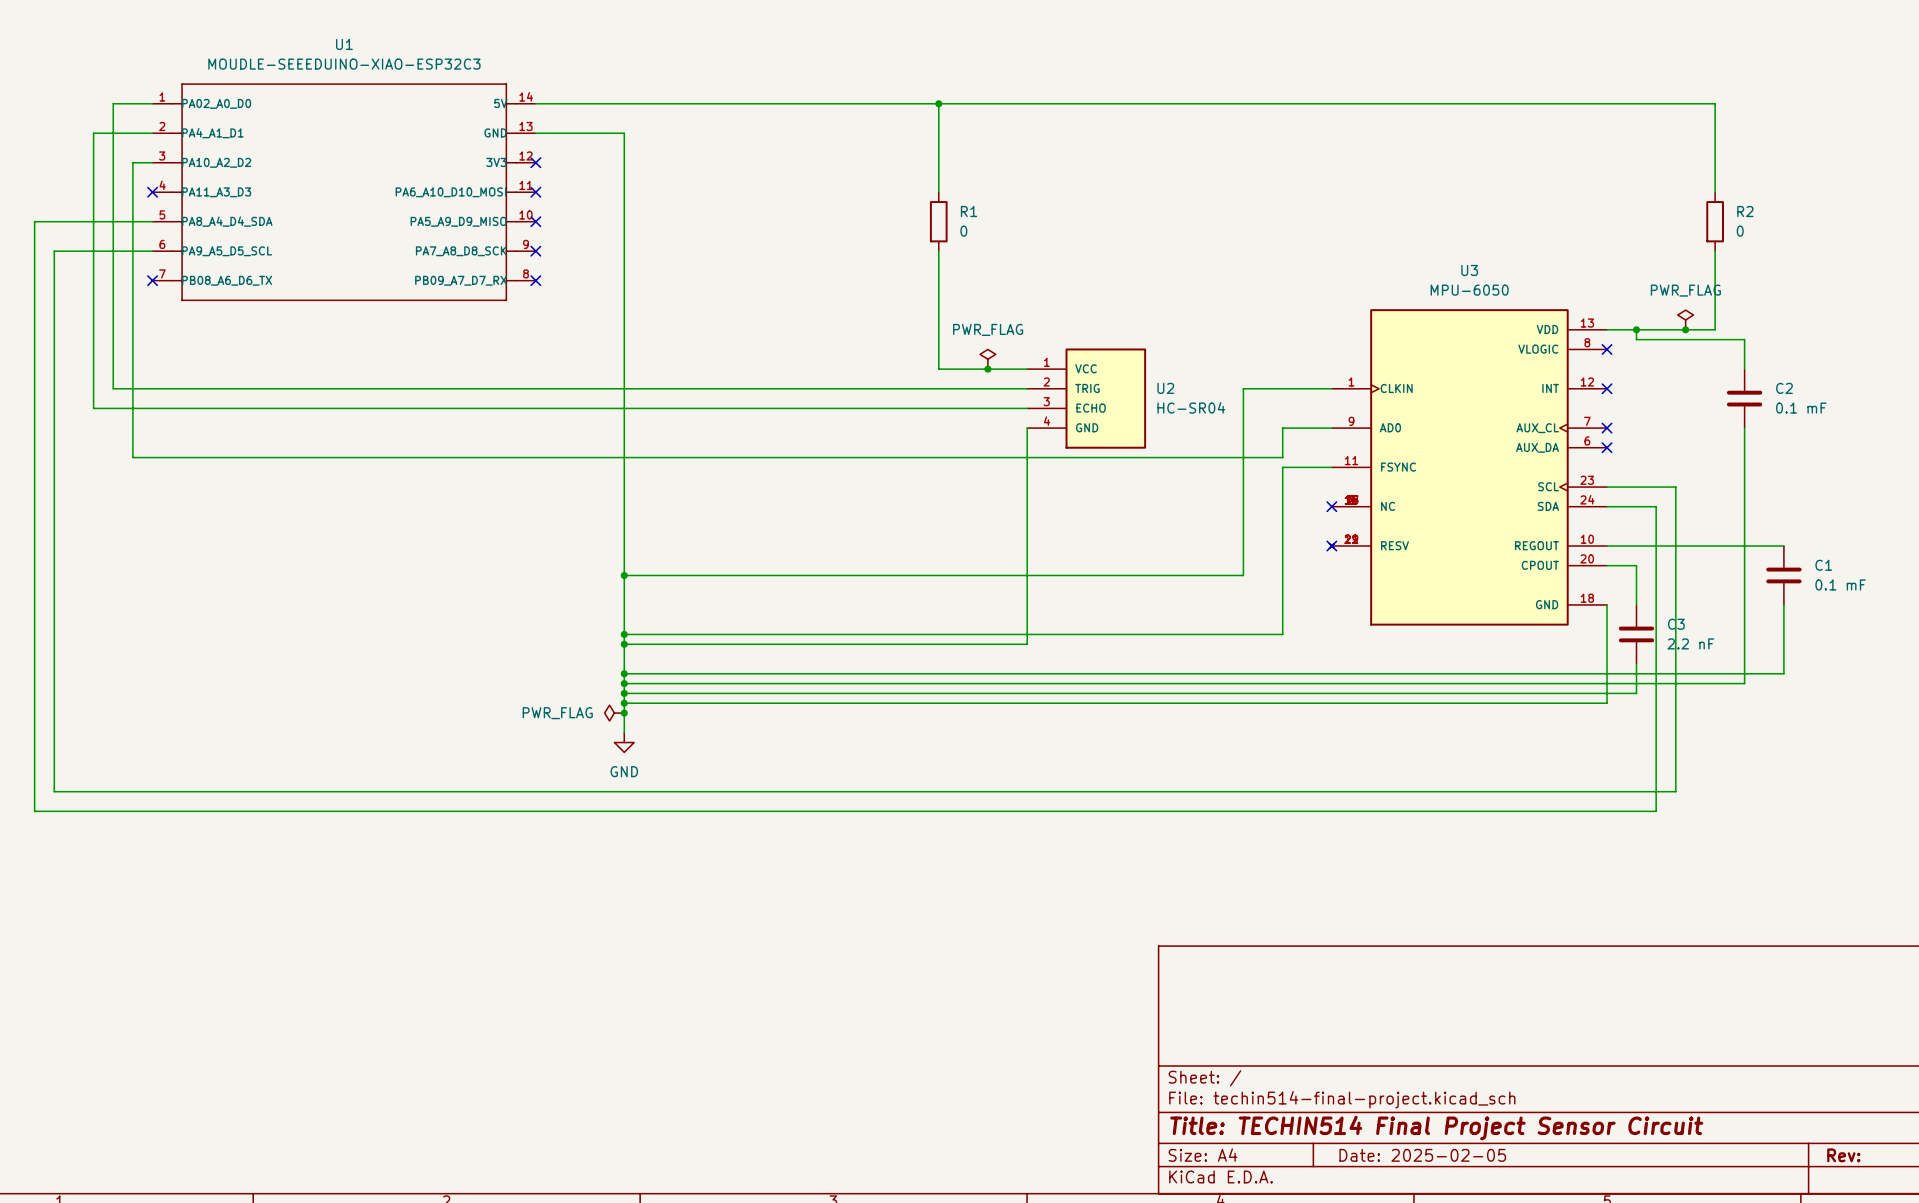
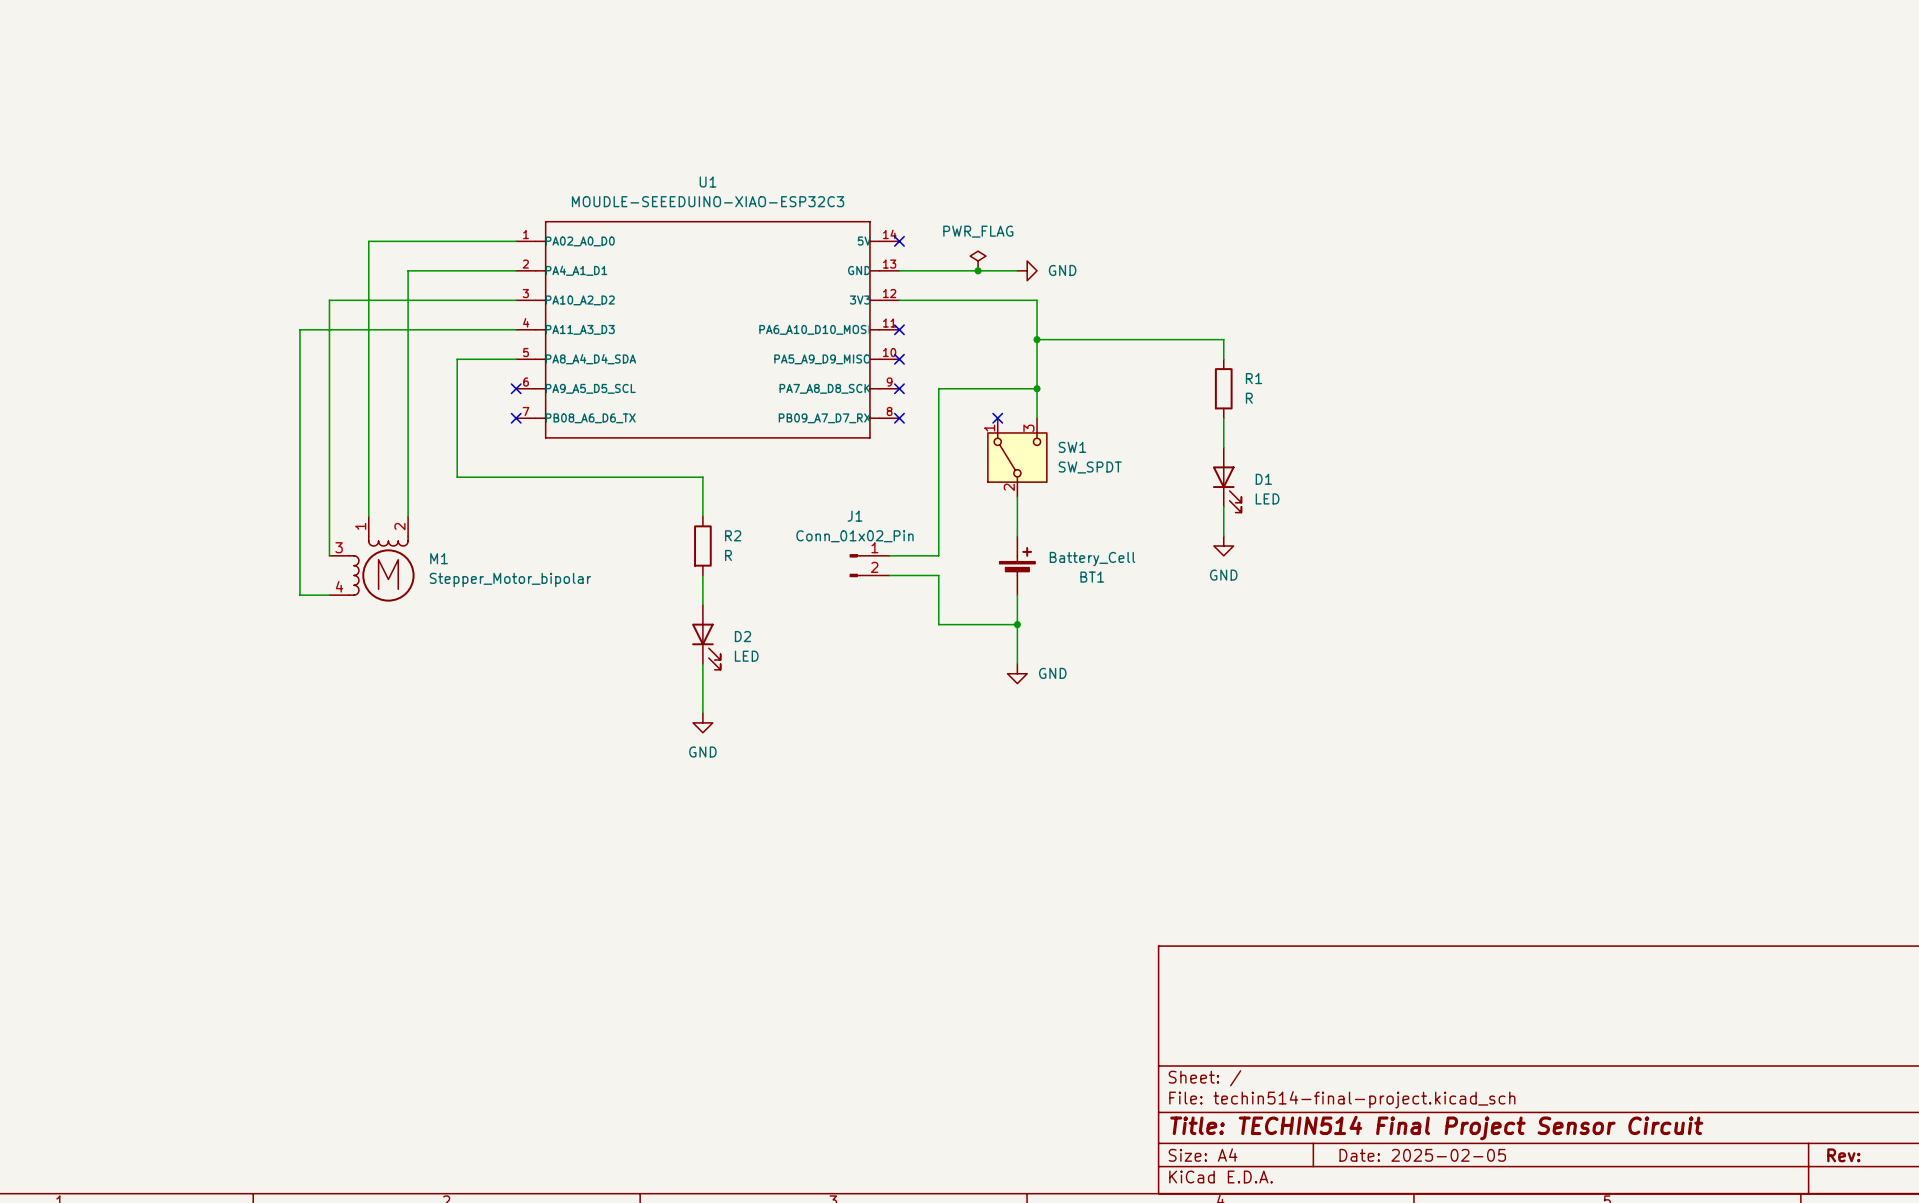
wire: (152, 103) (113, 103) (113, 388) (938, 388) -> (889, 555) (938, 555) (938, 388)
wire: (535, 103) (1715, 103) (1715, 192) -> none
wire: (938, 103) (938, 192) -> none
junction: (938, 103) -> none
wire: (152, 133) (93, 133) (93, 408) (1027, 408) -> none
wire: (535, 133) (624, 133) (624, 732) -> none
wire: (152, 162) (132, 162) (132, 457) (1282, 457) (1282, 428) (1331, 428) -> none
no-connect mark: (535, 162) -> none
no-connect mark: (152, 192) -> none
U1 position: (344, 192) -> (707, 329)
no-connect mark: (535, 192) -> none
wire: (152, 221) (34, 221) (34, 811) (1656, 811) (1656, 506) (1607, 506) -> none
no-connect mark: (535, 221) -> none
R1 position: (938, 221) -> (1223, 388)
R2 position: (1715, 221) -> (702, 546)
R1 value: 0 (963, 231) -> R (1249, 398)
R2 value: 0 (1740, 231) -> R (728, 555)
wire: none -> (516, 241) (368, 241) (368, 516)
no-connect mark: none -> (899, 241)
wire: (152, 251) (54, 251) (54, 791) (1675, 791) (1675, 487) (1607, 487) -> none
no-connect mark: (535, 251) -> none
wire: (938, 251) (938, 369) (1027, 369) -> none
wire: (1715, 251) (1715, 329) (1607, 329) -> none
wire: none -> (516, 270) (408, 270) (408, 516)
wire: none -> (899, 270) (1017, 270)
junction: none -> (978, 270)
power symbol: none -> GND (1027, 270)
no-connect mark: (152, 280) -> none
no-connect mark: (535, 280) -> none
wire: none -> (516, 300) (329, 300) (329, 555)
wire: none -> (899, 300) (1037, 300) (1037, 418)
power symbol: PWR_FLAG (1685, 319) -> none
wire: none -> (516, 329) (299, 329) (299, 595) (329, 595)
no-connect mark: none -> (899, 329)
wire: (1636, 329) (1636, 339) (1744, 339) (1744, 369) -> none
junction: (1636, 329) -> none
junction: (1685, 329) -> none
wire: none -> (1037, 339) (1223, 339) (1223, 359)
junction: none -> (1037, 339)
no-connect mark: (1607, 349) -> none
wire: none -> (516, 359) (457, 359) (457, 477) (702, 477) (702, 516)
no-connect mark: none -> (899, 359)
power symbol position: PWR_FLAG (987, 359) -> PWR_FLAG (978, 261)
junction: (987, 369) -> none
no-connect mark: none -> (516, 388)
no-connect mark: none -> (899, 388)
junction: none -> (1037, 388)
wire: (1331, 388) (1243, 388) (1243, 575) (938, 575) -> (1017, 624) (938, 624) (938, 575)
no-connect mark: (1607, 388) -> none
U2: HC-SR04 (1086, 398) -> none
C2: 0.1 mF (1744, 398) -> none
no-connect mark: none -> (516, 418)
no-connect mark: none -> (899, 418)
no-connect mark: none -> (997, 418)
wire: none -> (1223, 418) (1223, 447)
wire: (1027, 428) (1027, 644) (624, 644) -> none
no-connect mark: (1607, 428) -> none
wire: (1744, 428) (1744, 683) (624, 683) -> none
no-connect mark: (1607, 447) -> none
SW1: none -> SW_SPDT (1017, 457)
wire: (1331, 467) (1282, 467) (1282, 634) (624, 634) -> none
U3: MPU-6050 (1468, 467) -> none
D1: none -> LED (1227, 480)
wire: none -> (1017, 496) (1017, 536)
wire: none -> (1223, 506) (1223, 536)
no-connect mark: (1331, 506) -> none
power symbol: none -> GND (1223, 546)
no-connect mark: (1331, 546) -> none
wire: (1607, 546) (1783, 546) -> none
M1: none -> Stepper_Motor_bipolar (372, 559)
J1: none -> Conn_01x02_Pin (869, 565)
BT1: none -> Battery_Cell (1017, 565)
wire: (1607, 565) (1636, 565) (1636, 604) -> none
wire: (624, 575) (889, 575) -> none
junction: (624, 575) -> none
wire: none -> (702, 575) (702, 604)
C1: 0.1 mF (1783, 575) -> none
wire: none -> (1017, 595) (1017, 663)
wire: (1607, 604) (1607, 703) (624, 703) -> none
wire: (1783, 604) (1783, 673) (624, 673) -> none
junction: none -> (1017, 624)
junction: (624, 634) -> none
C3: 2.2 nF (1636, 634) -> none
D2: none -> LED (706, 637)
junction: (624, 644) -> none
wire: none -> (702, 663) (702, 713)
wire: (1636, 663) (1636, 693) (624, 693) -> none
junction: (624, 673) -> none
power symbol: none -> GND (1017, 673)
junction: (624, 683) -> none
junction: (624, 693) -> none
junction: (624, 703) -> none
power symbol: PWR_FLAG (614, 713) -> none
junction: (624, 713) -> none
power symbol position: GND (624, 742) -> GND (702, 722)

